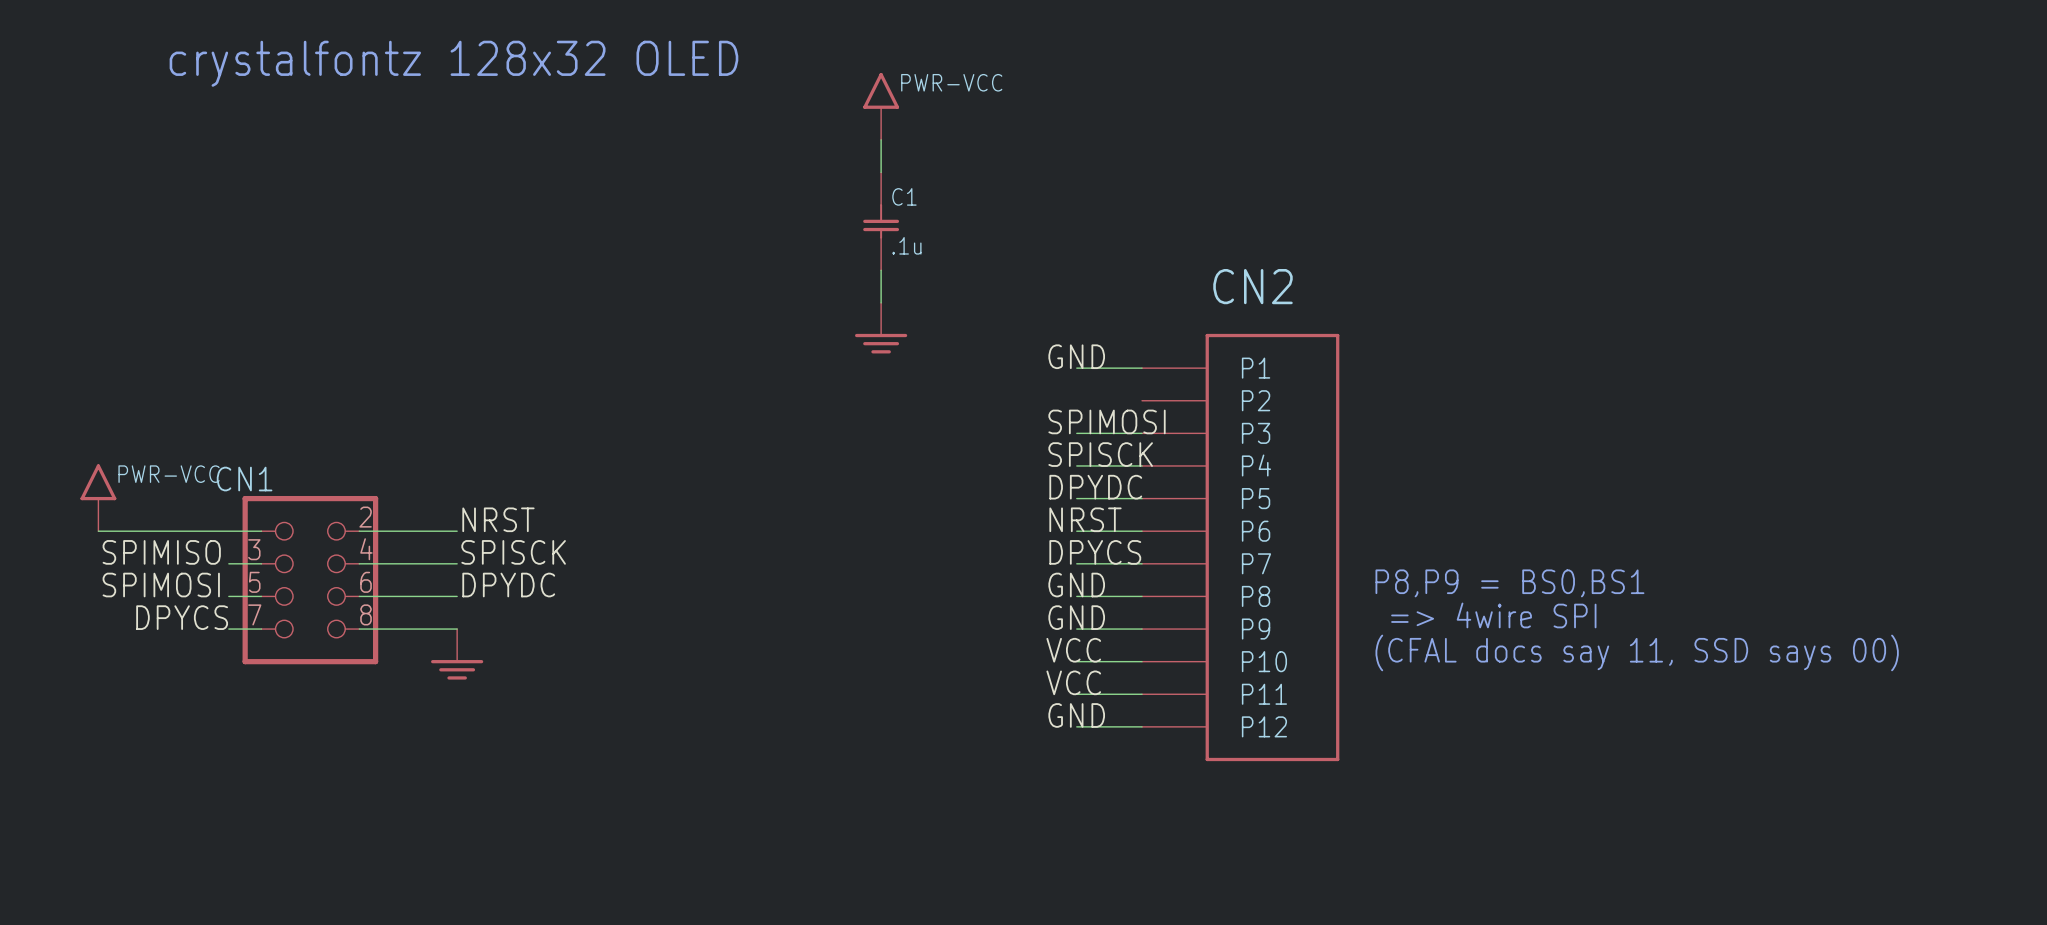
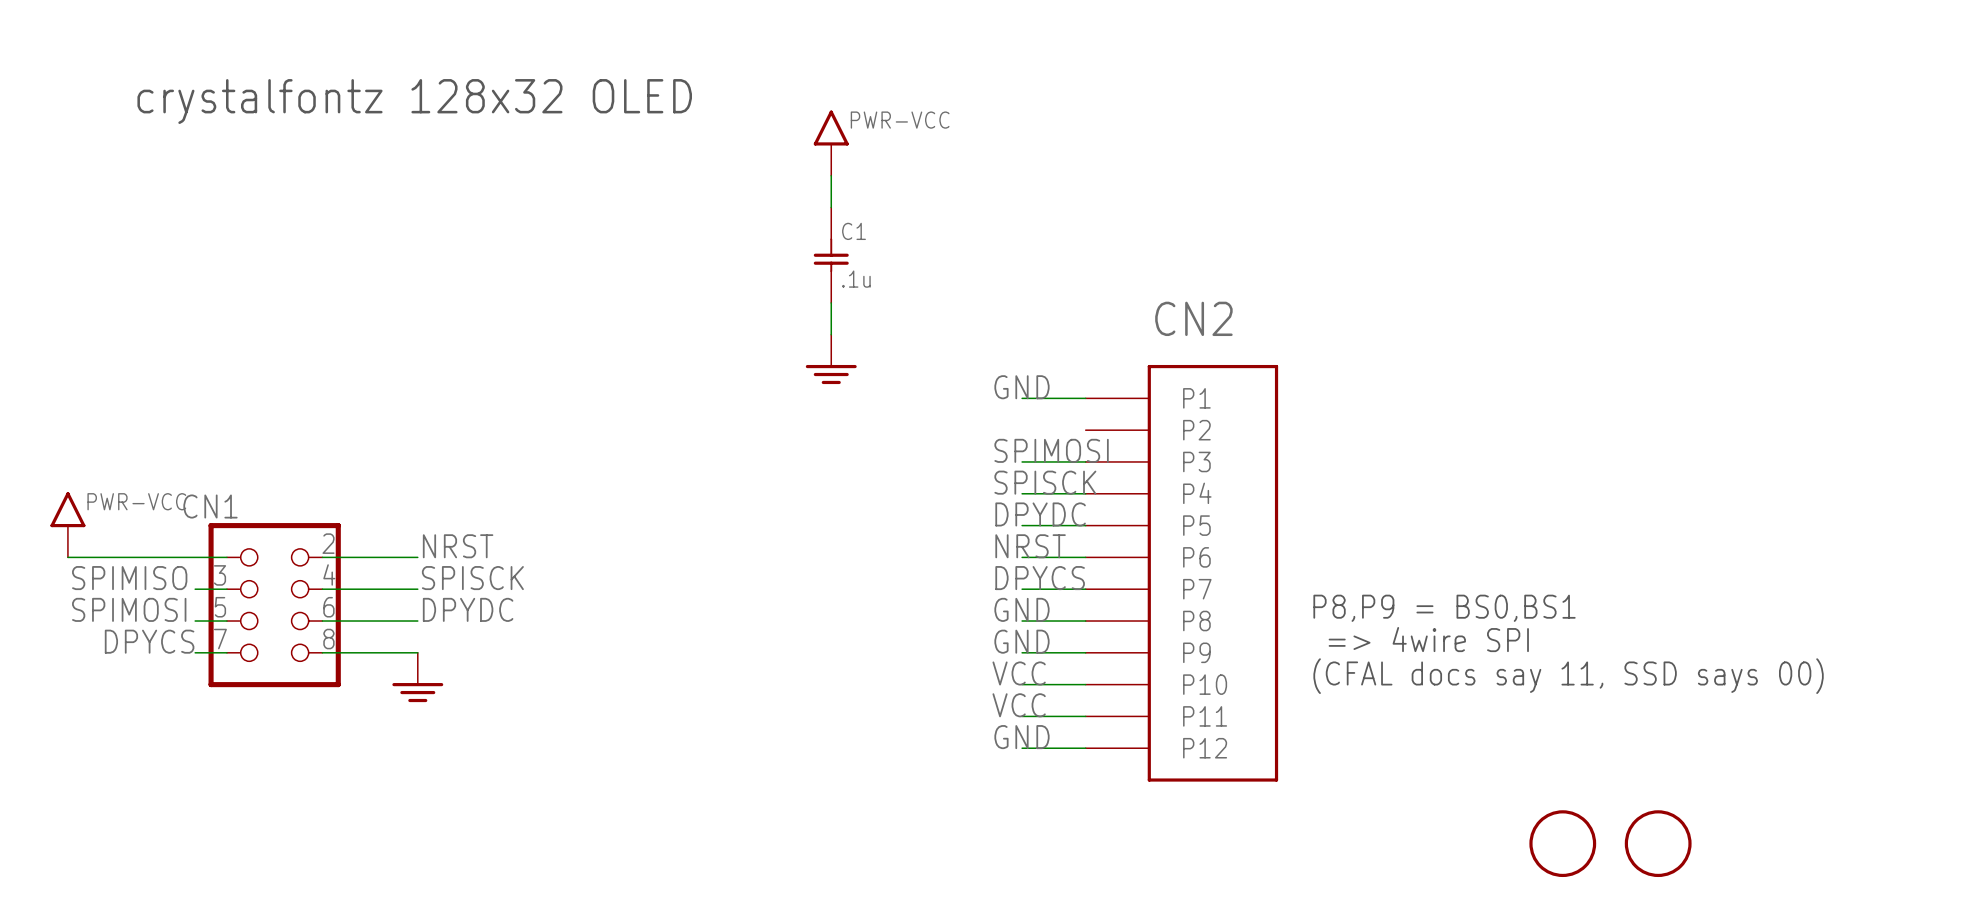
part: none -> (1562, 843)
part: none -> (1658, 843)

